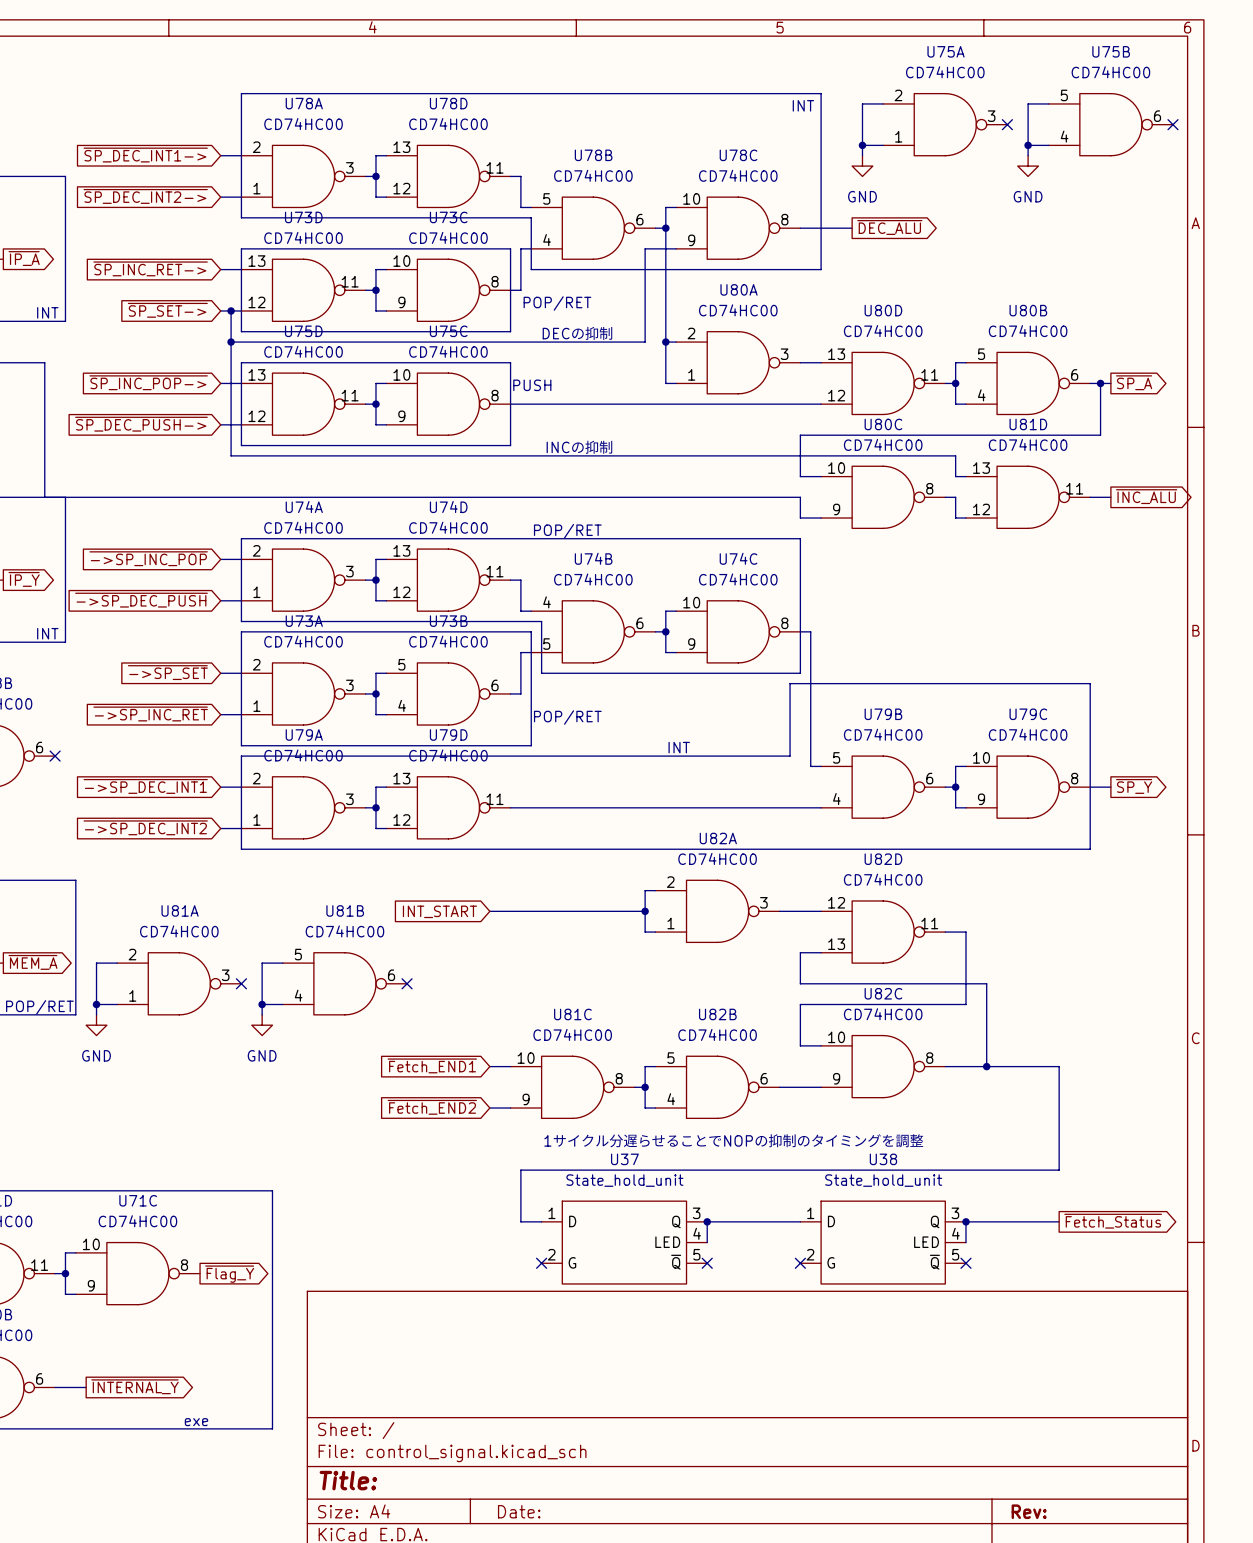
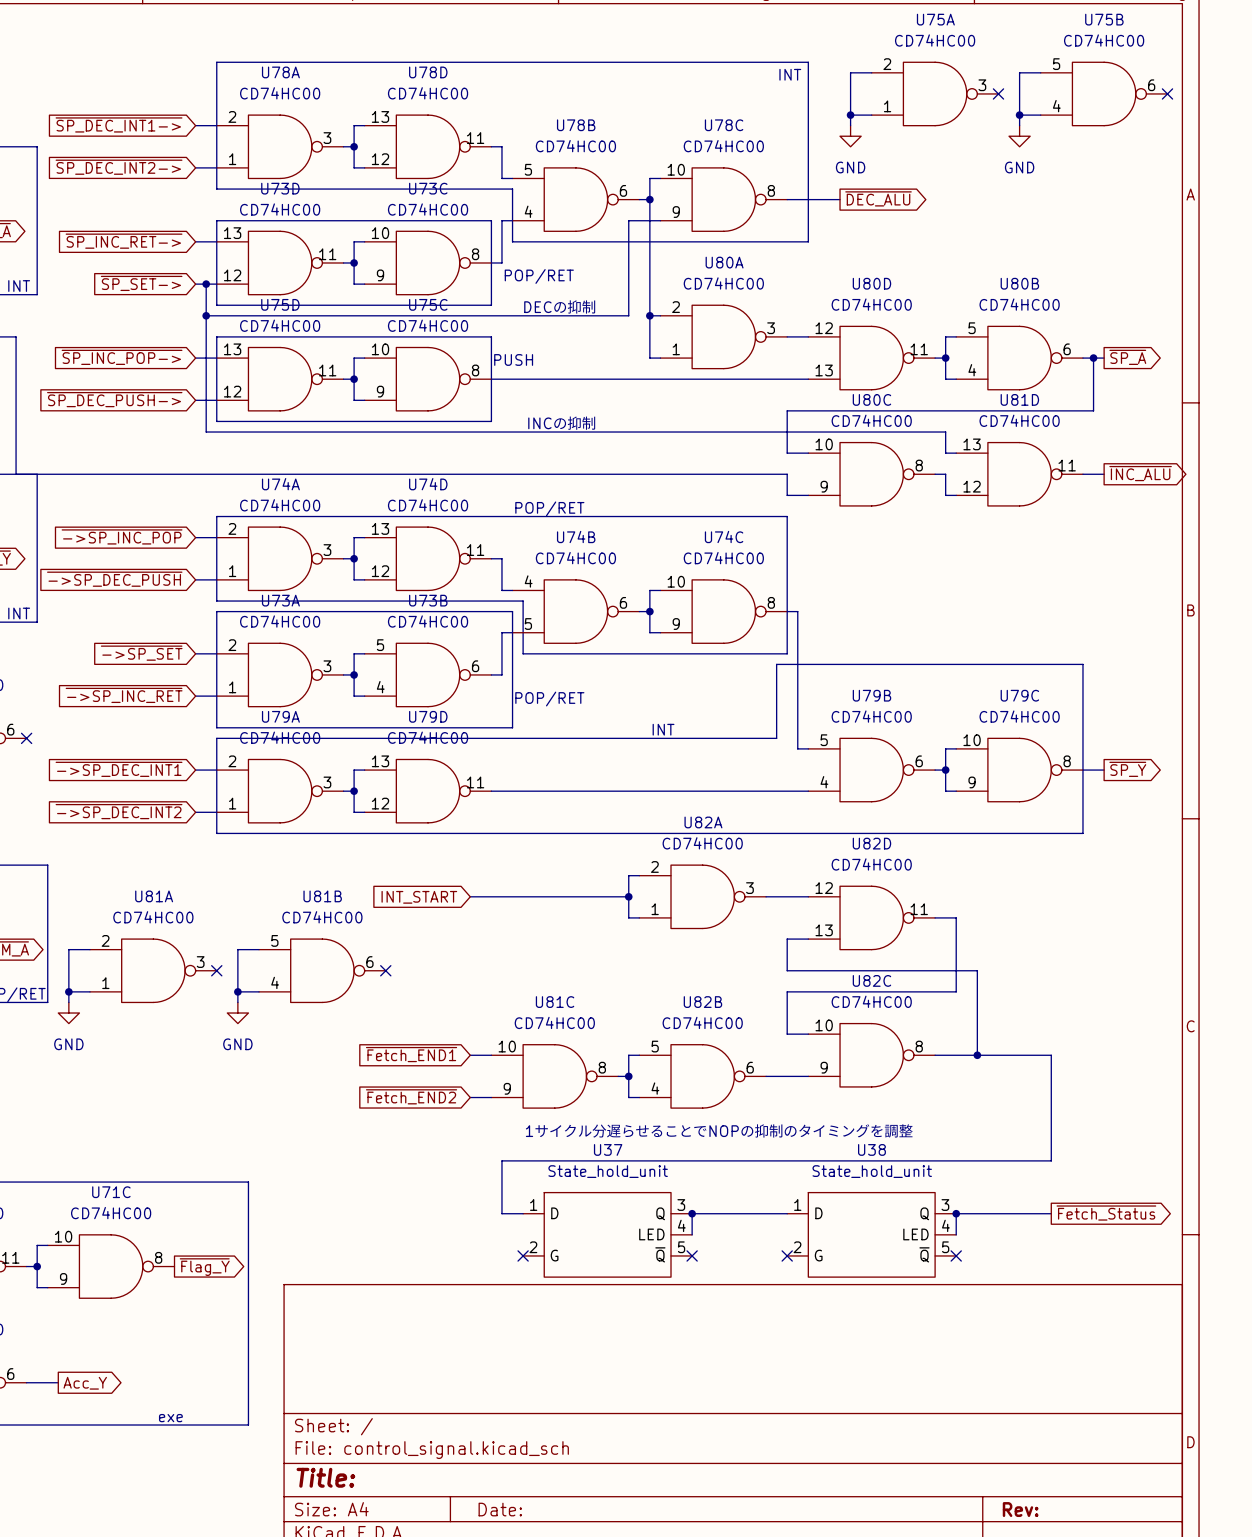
U80D flip: as is (883, 383) -> up-down (871, 358)
global label: ~{INTERNAL_Y} (135, 1386) -> Acc_Y (85, 1383)

